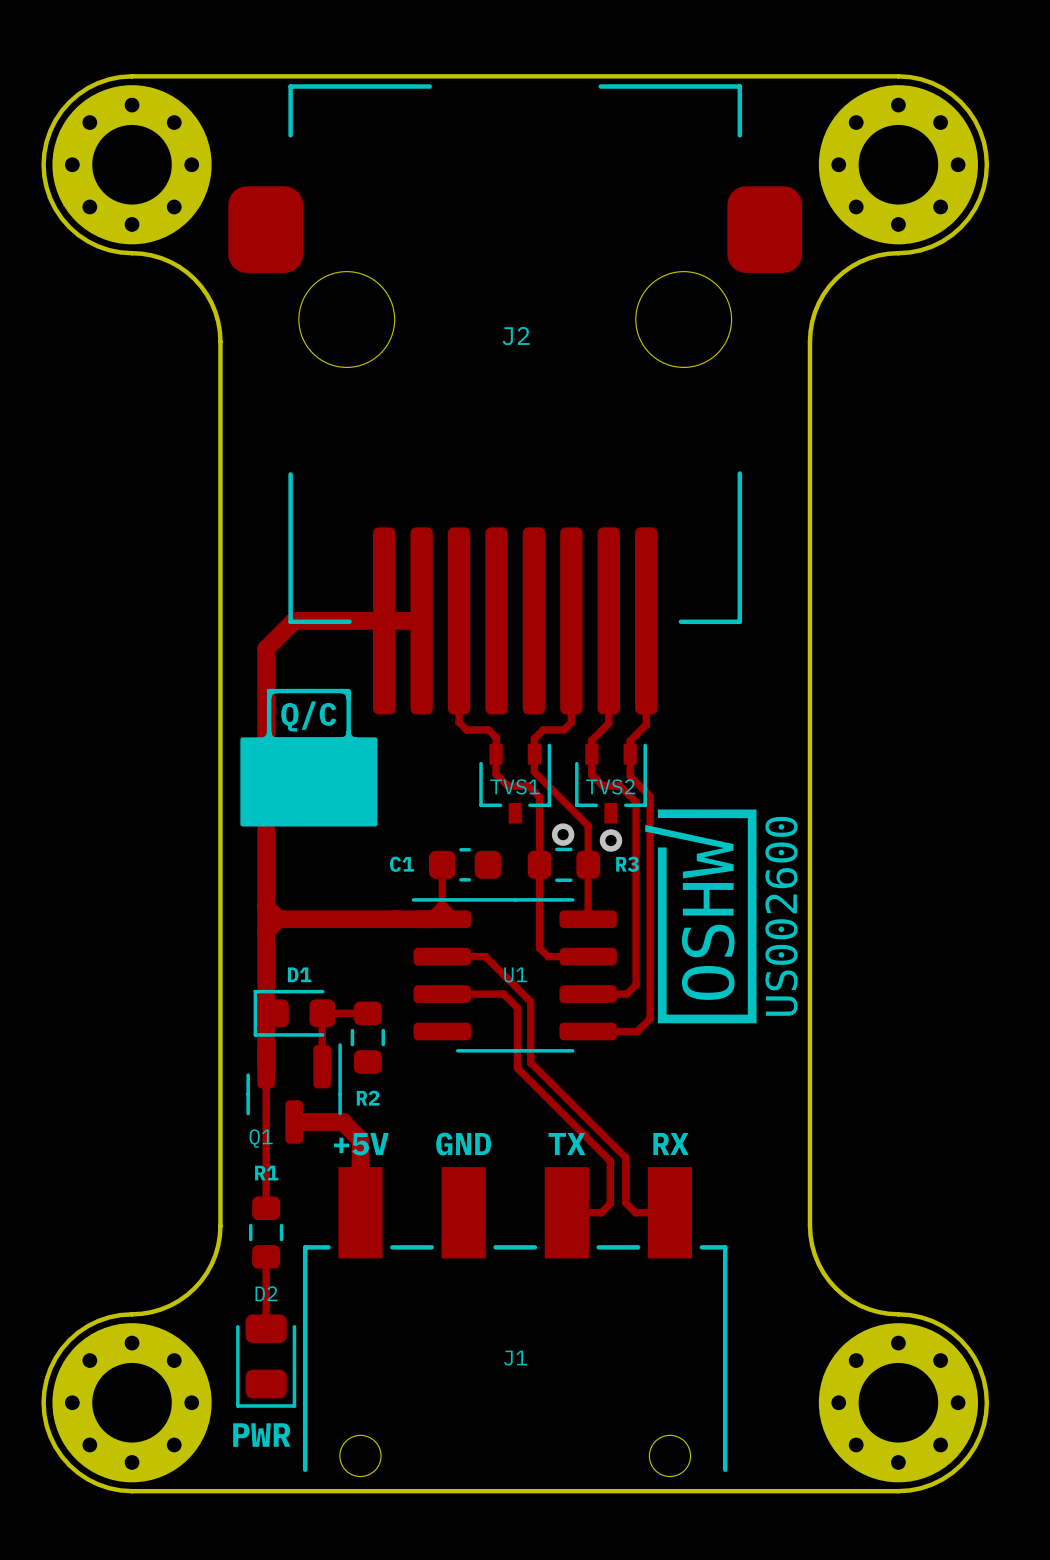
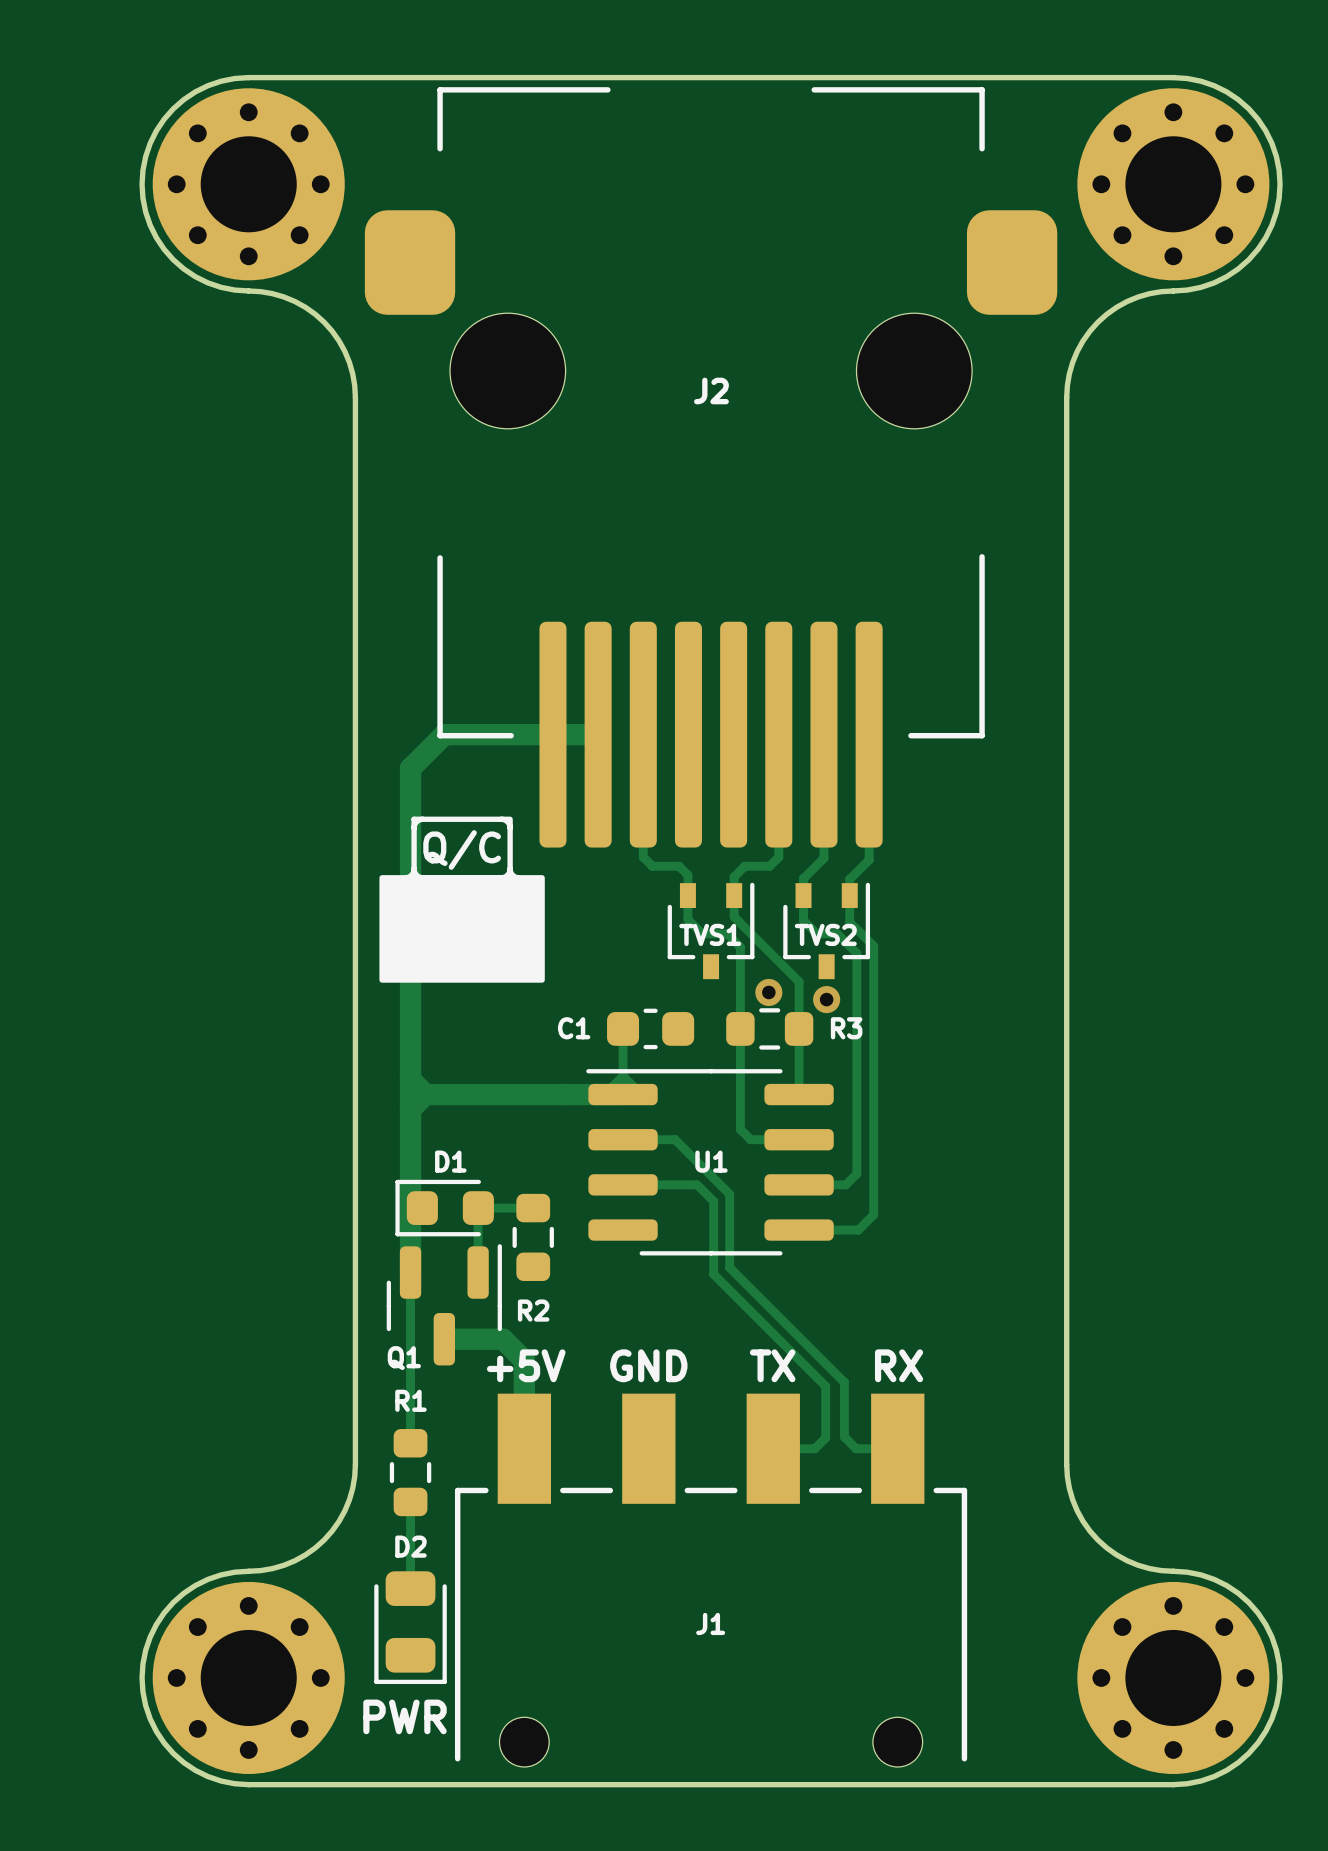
drawing: [645, 809, 798, 1024] -> none

